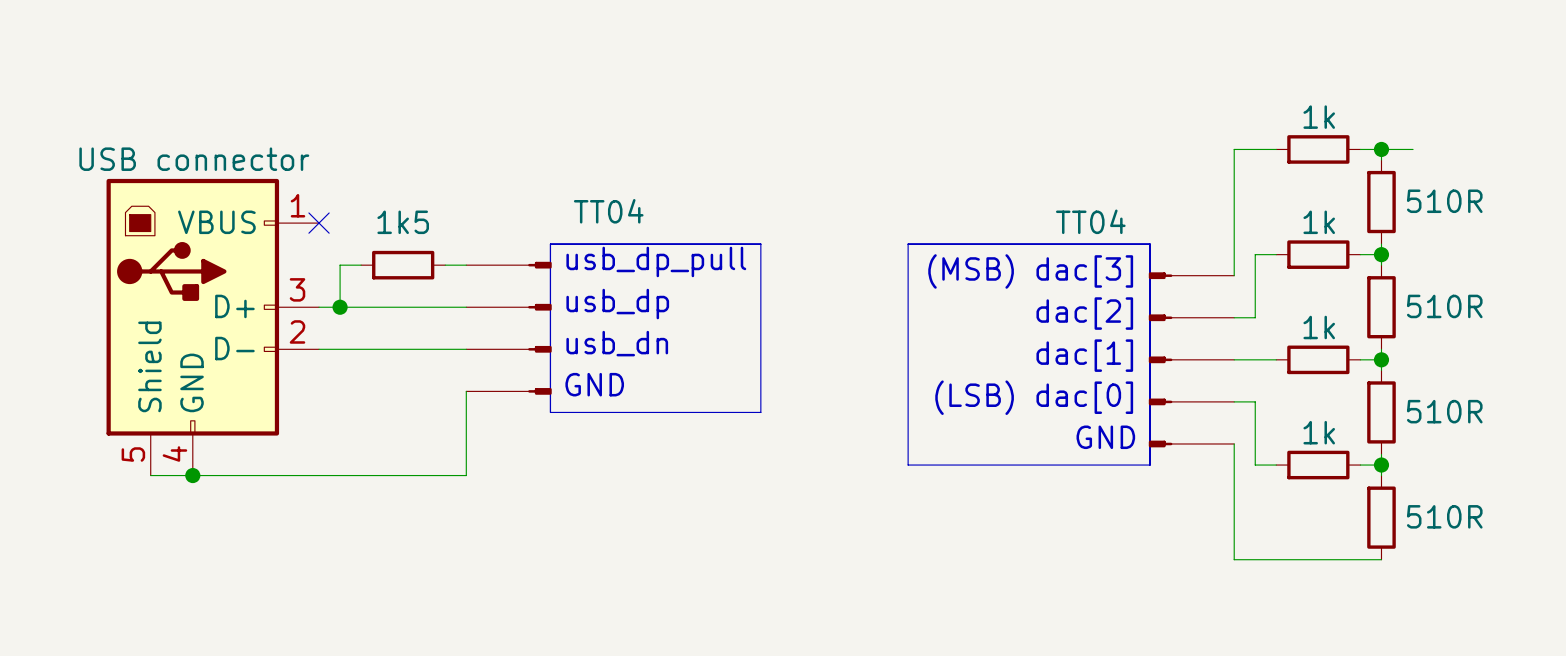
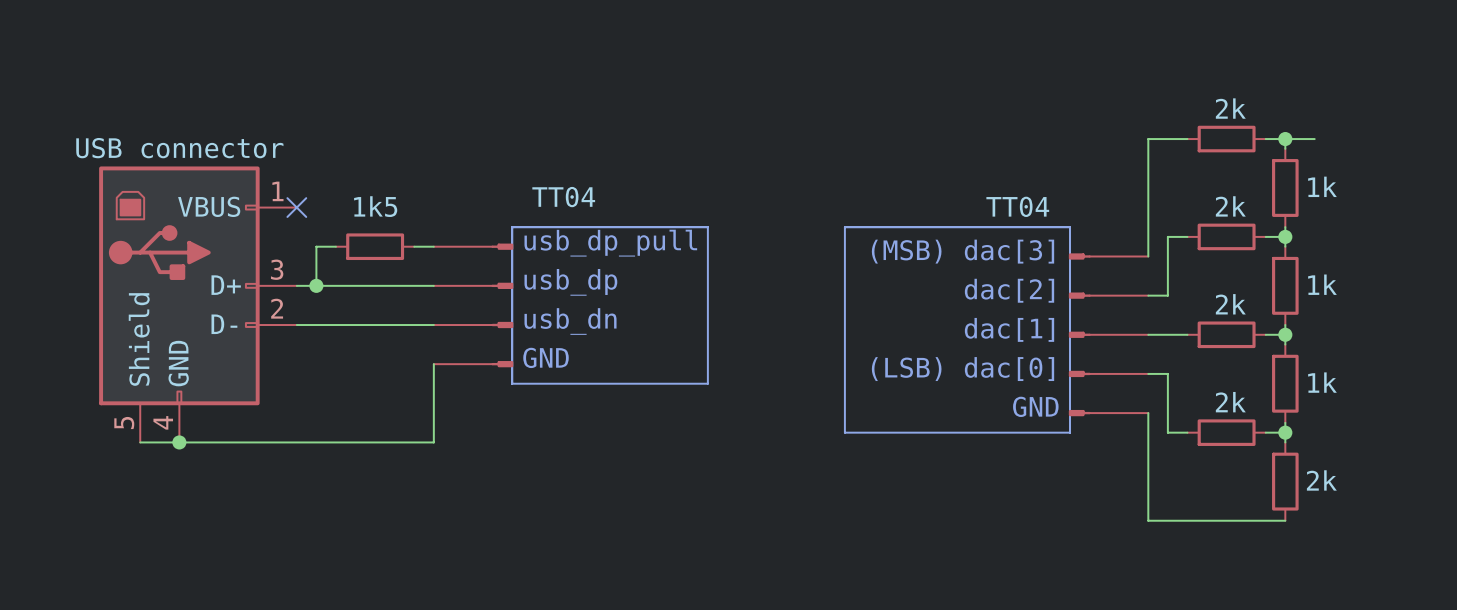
part value: 1k (1319, 117) -> 2k (1230, 108)
part value: 510R (1444, 201) -> 1k (1322, 186)
part value: 1k (1319, 222) -> 2k (1230, 206)
part value: 510R (1444, 306) -> 1k (1322, 284)
part value: 1k (1319, 327) -> 2k (1230, 304)
part value: 510R (1444, 411) -> 1k (1322, 382)
part value: 1k (1319, 432) -> 2k (1230, 402)
part value: 510R (1444, 516) -> 2k (1321, 480)

